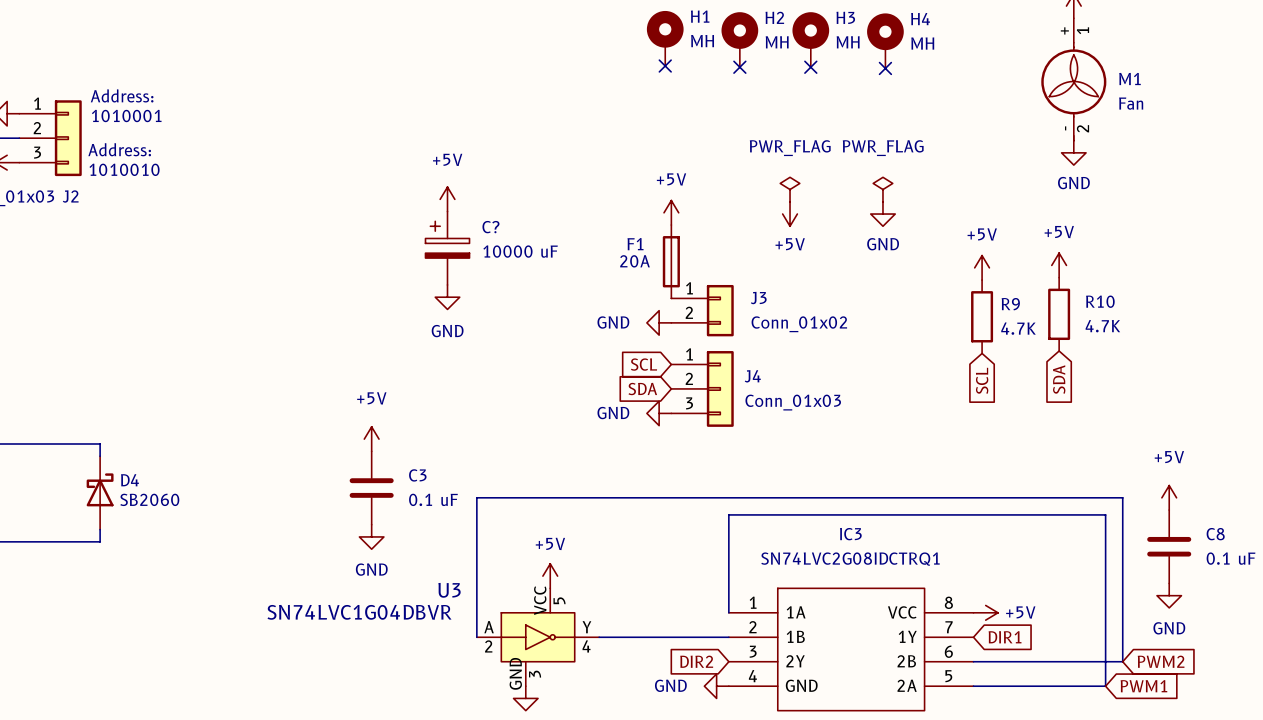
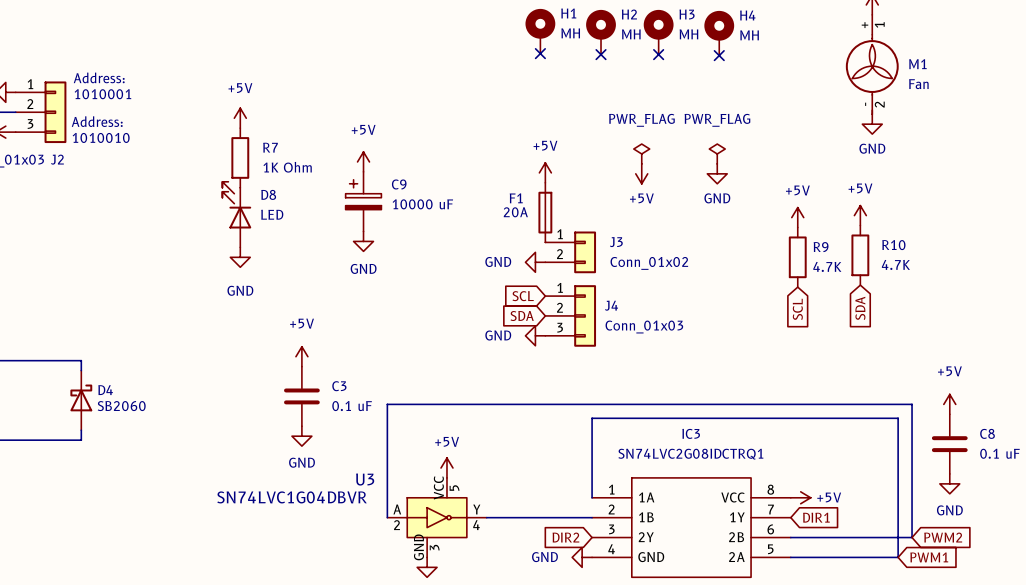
power symbol: none -> +5V (240, 118)
R7: none -> 1K Ohm (240, 157)
C? name: C? (490, 227) -> C9 (399, 184)
D8: none -> LED (236, 214)
power symbol: none -> GND (240, 257)

